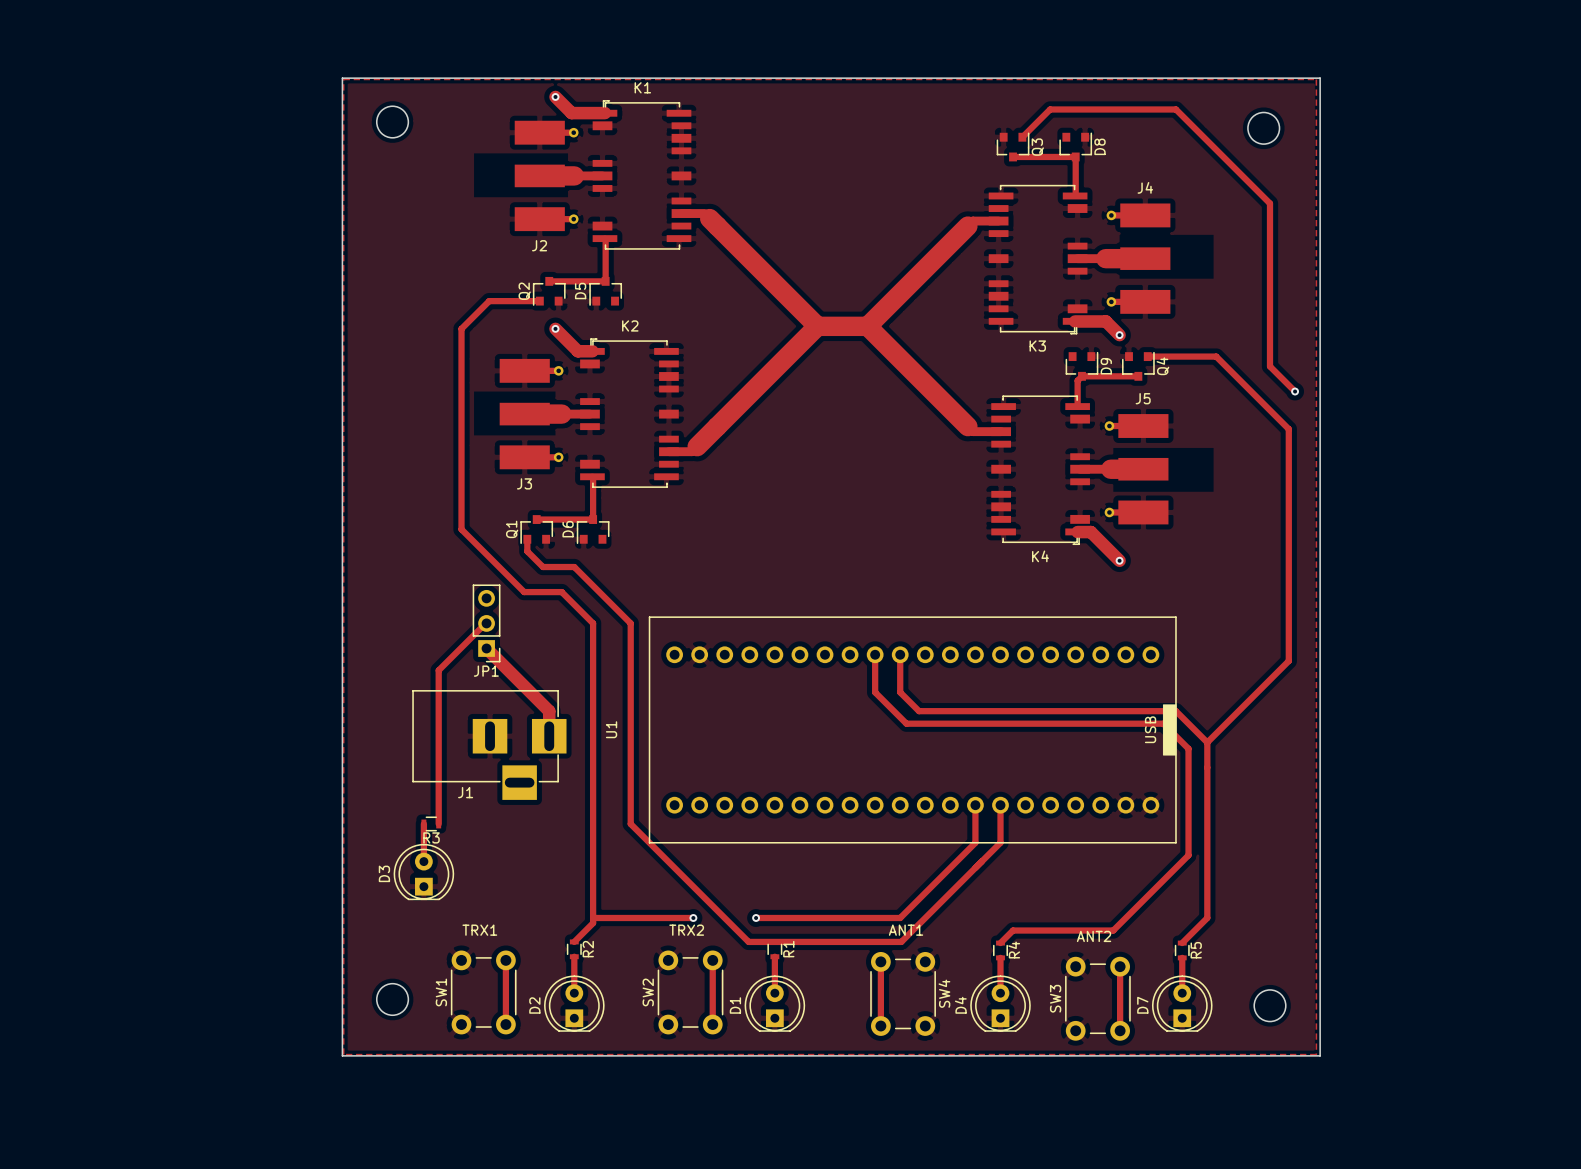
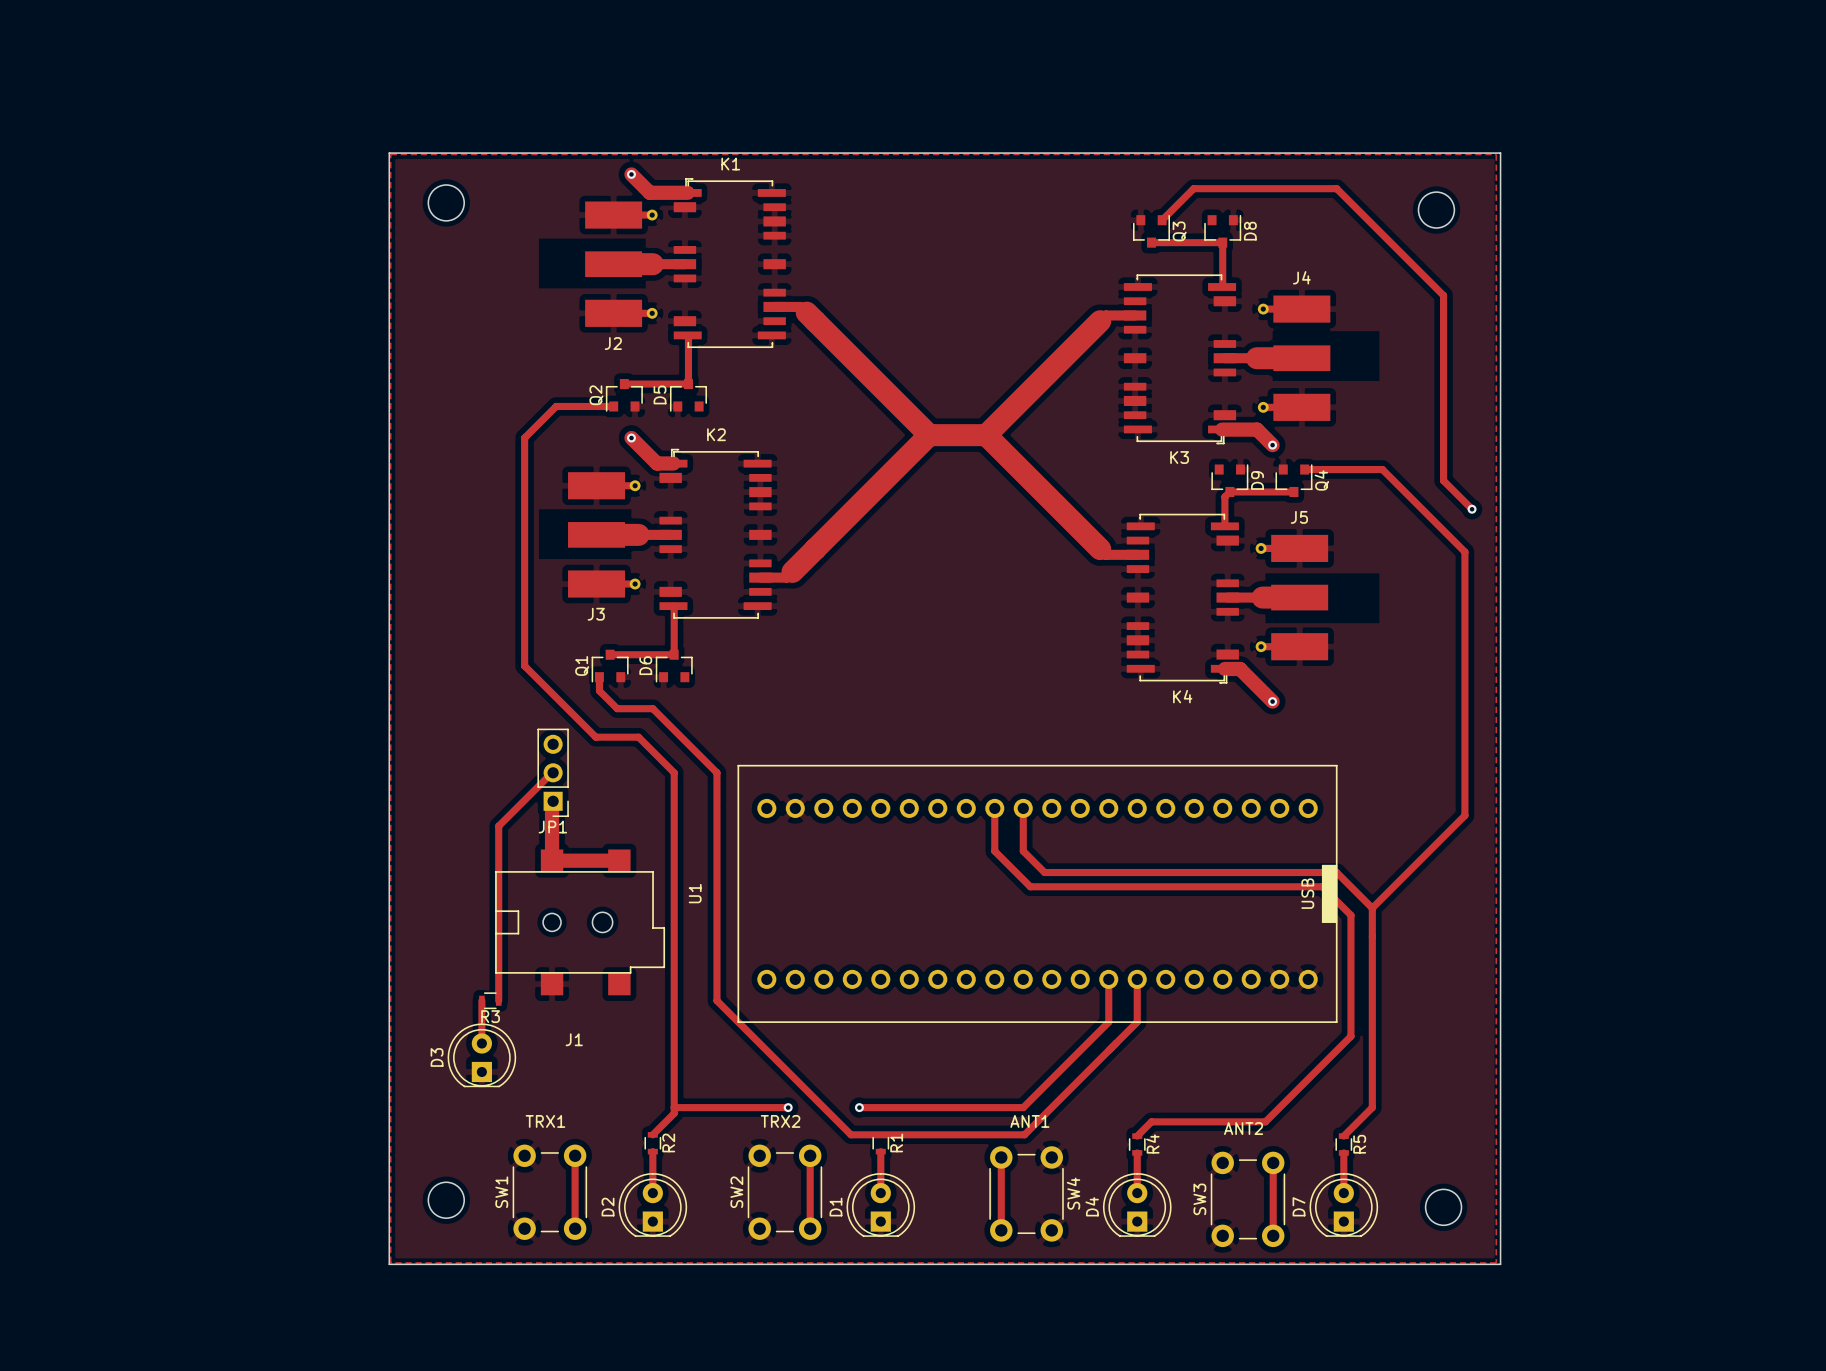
track: (486, 648) (549, 711) (549, 736) -> (553, 801) (552, 860) (619, 860)
J1 footprint: [412, 690, 567, 800] -> [495, 849, 666, 996]
J1 name position: J1 (465, 792) -> J1 (574, 1039)

